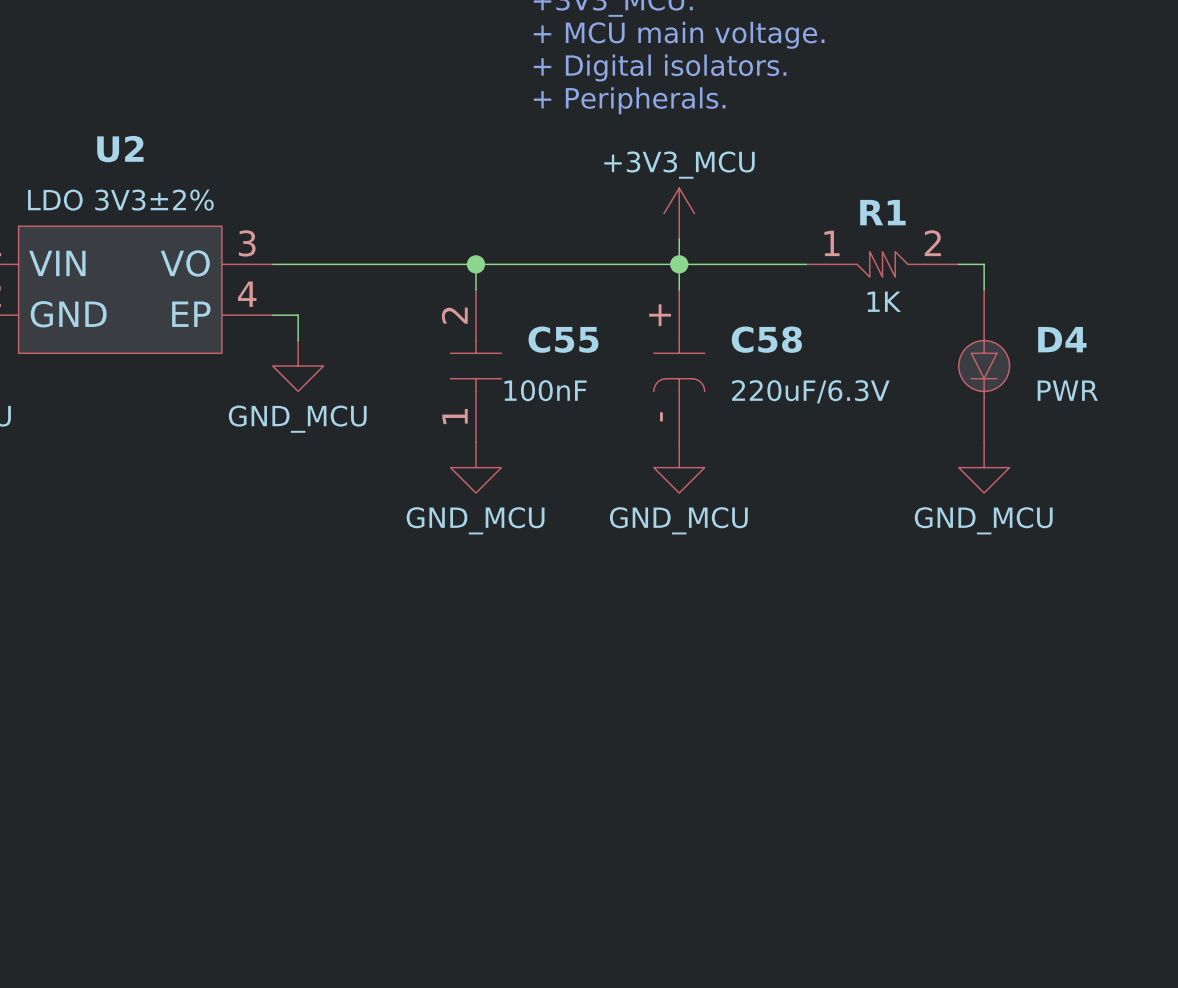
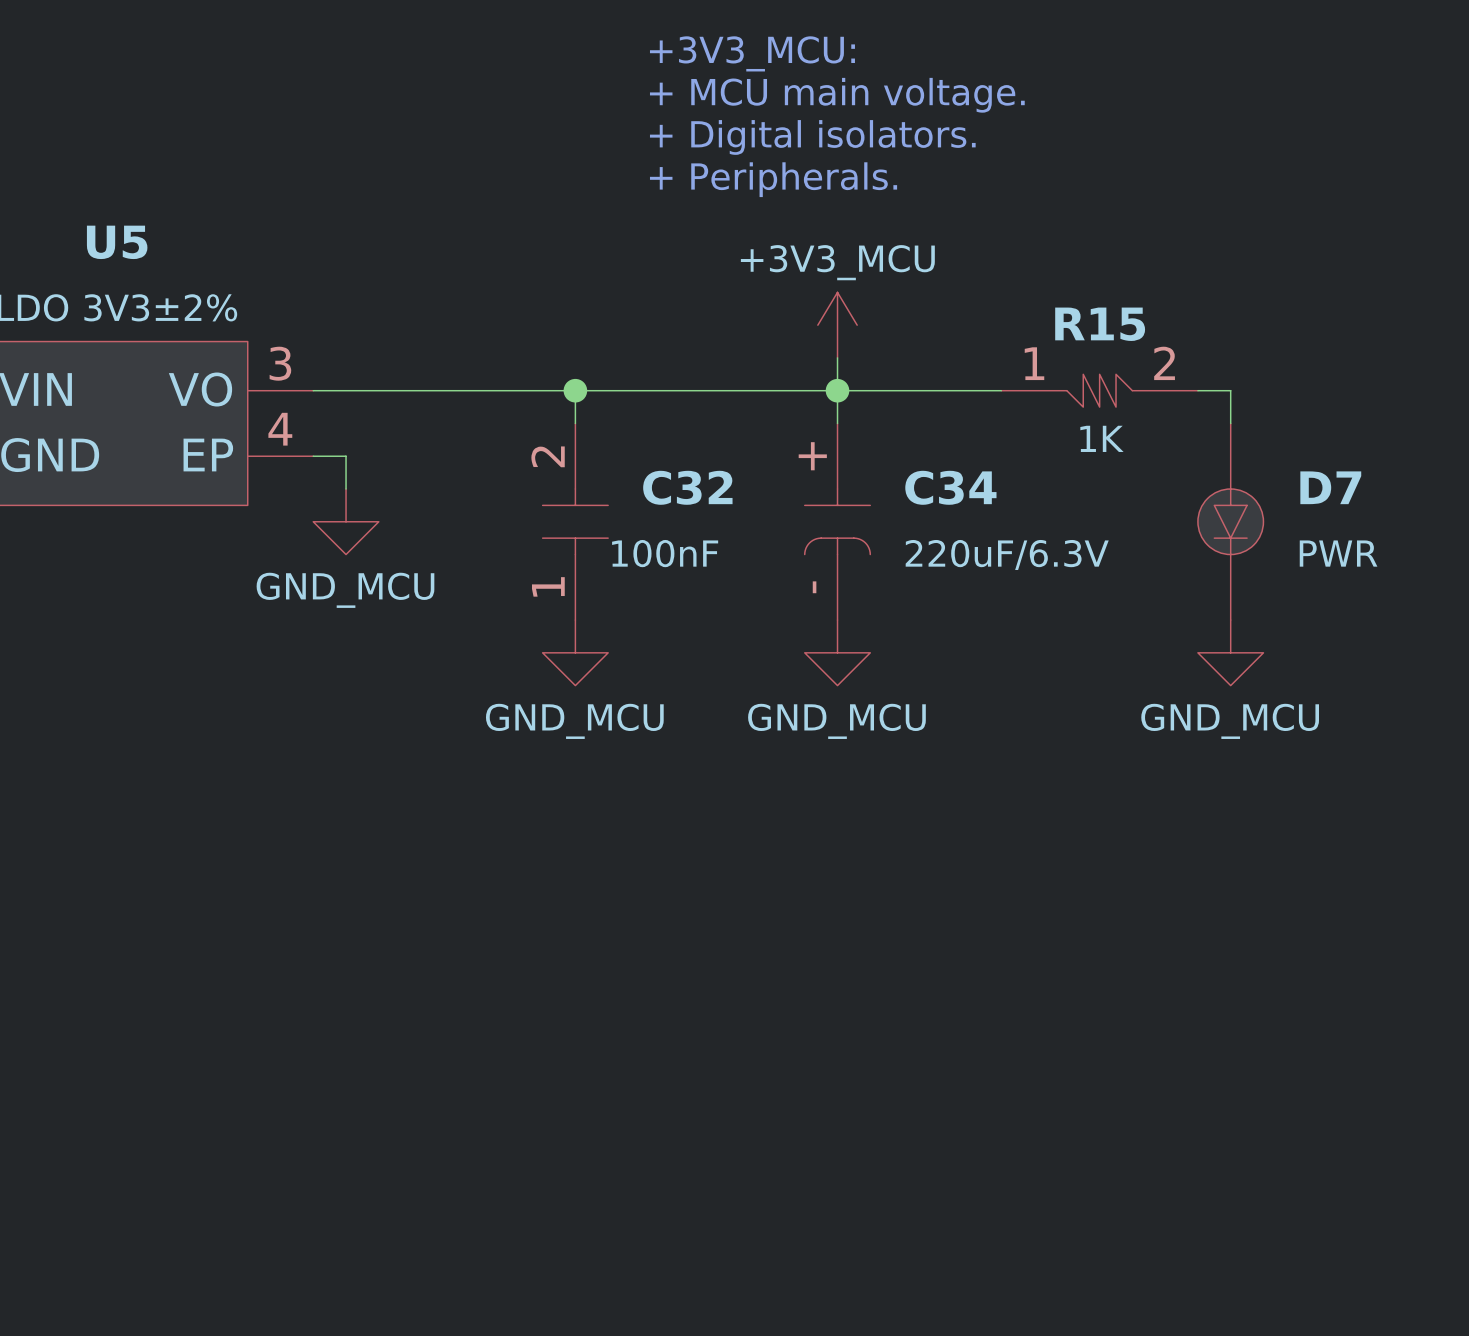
U2 name: U2 (120, 149) -> U5 (117, 242)
R1 name: R1 (882, 212) -> R15 (1100, 324)
C55 name: C55 (563, 339) -> C32 (687, 487)
C58 name: C58 (766, 339) -> C34 (950, 487)
D4 name: D4 (1062, 339) -> D7 (1330, 487)

